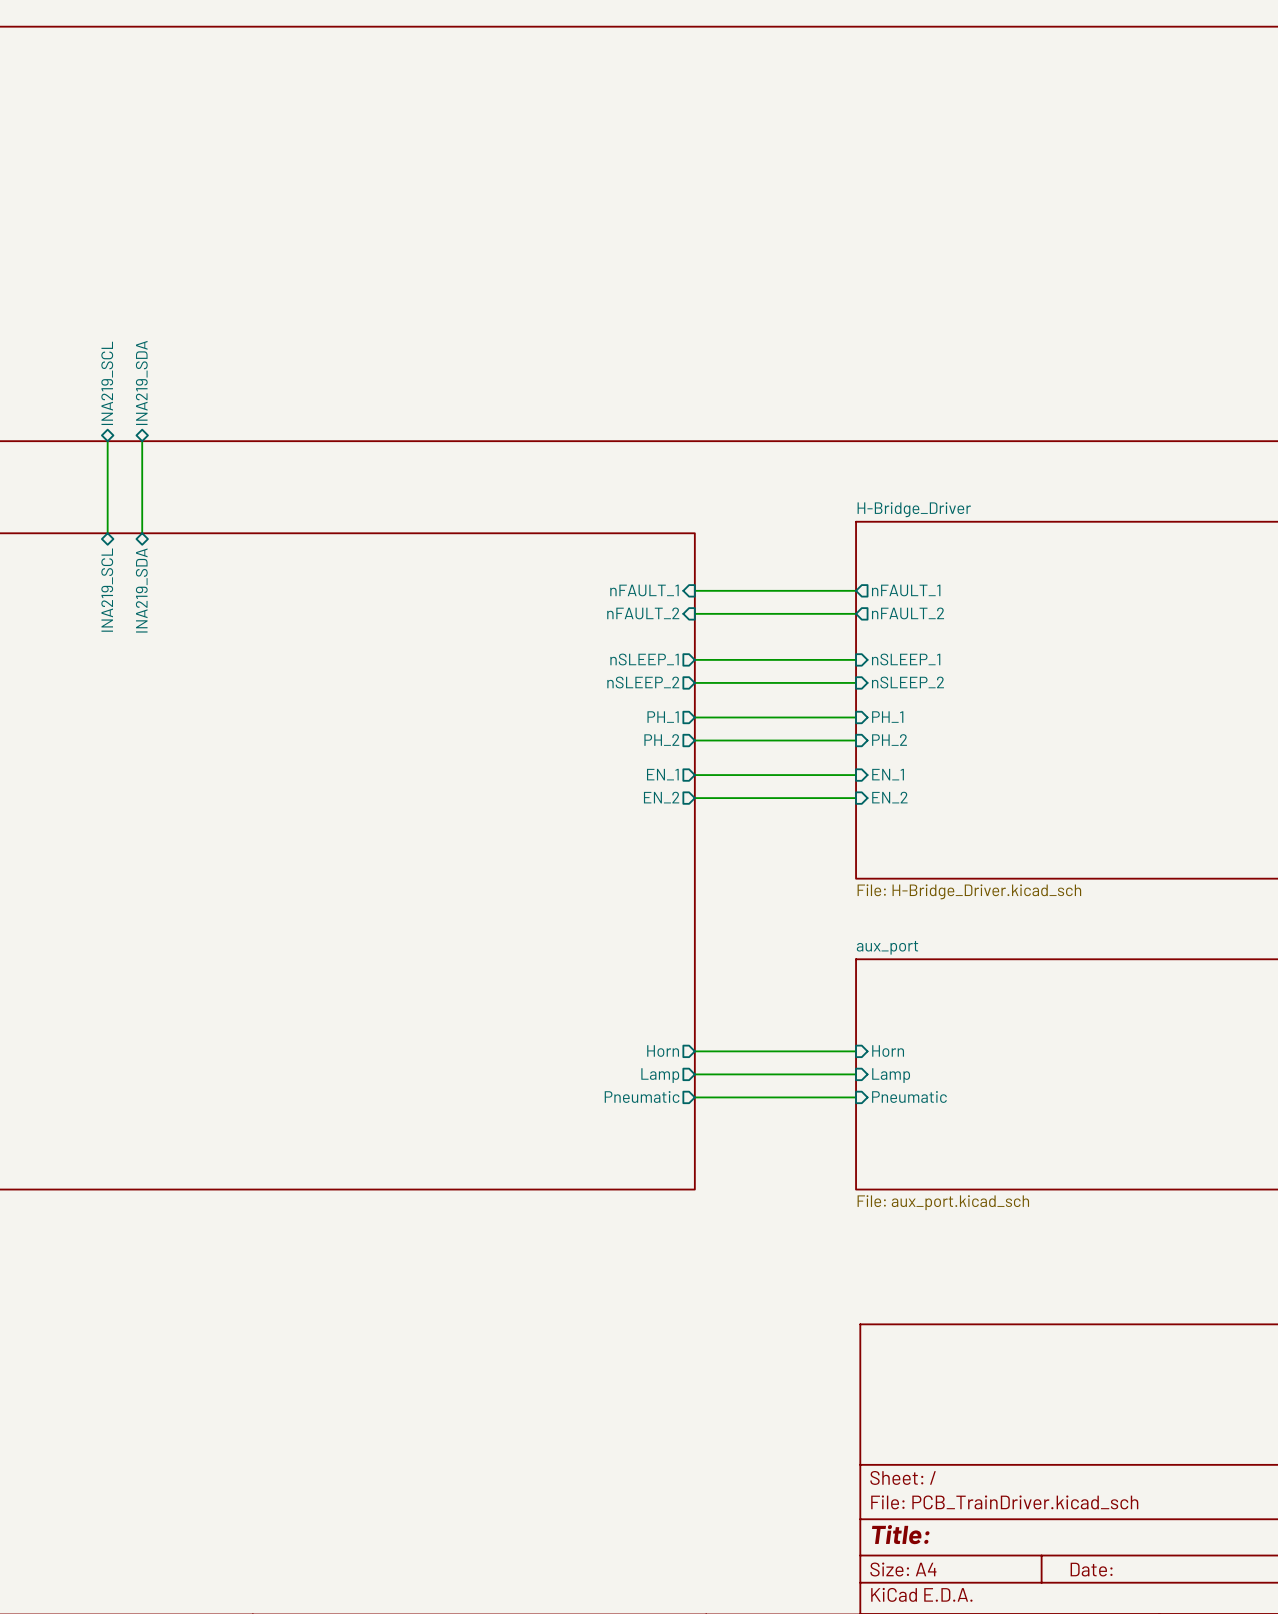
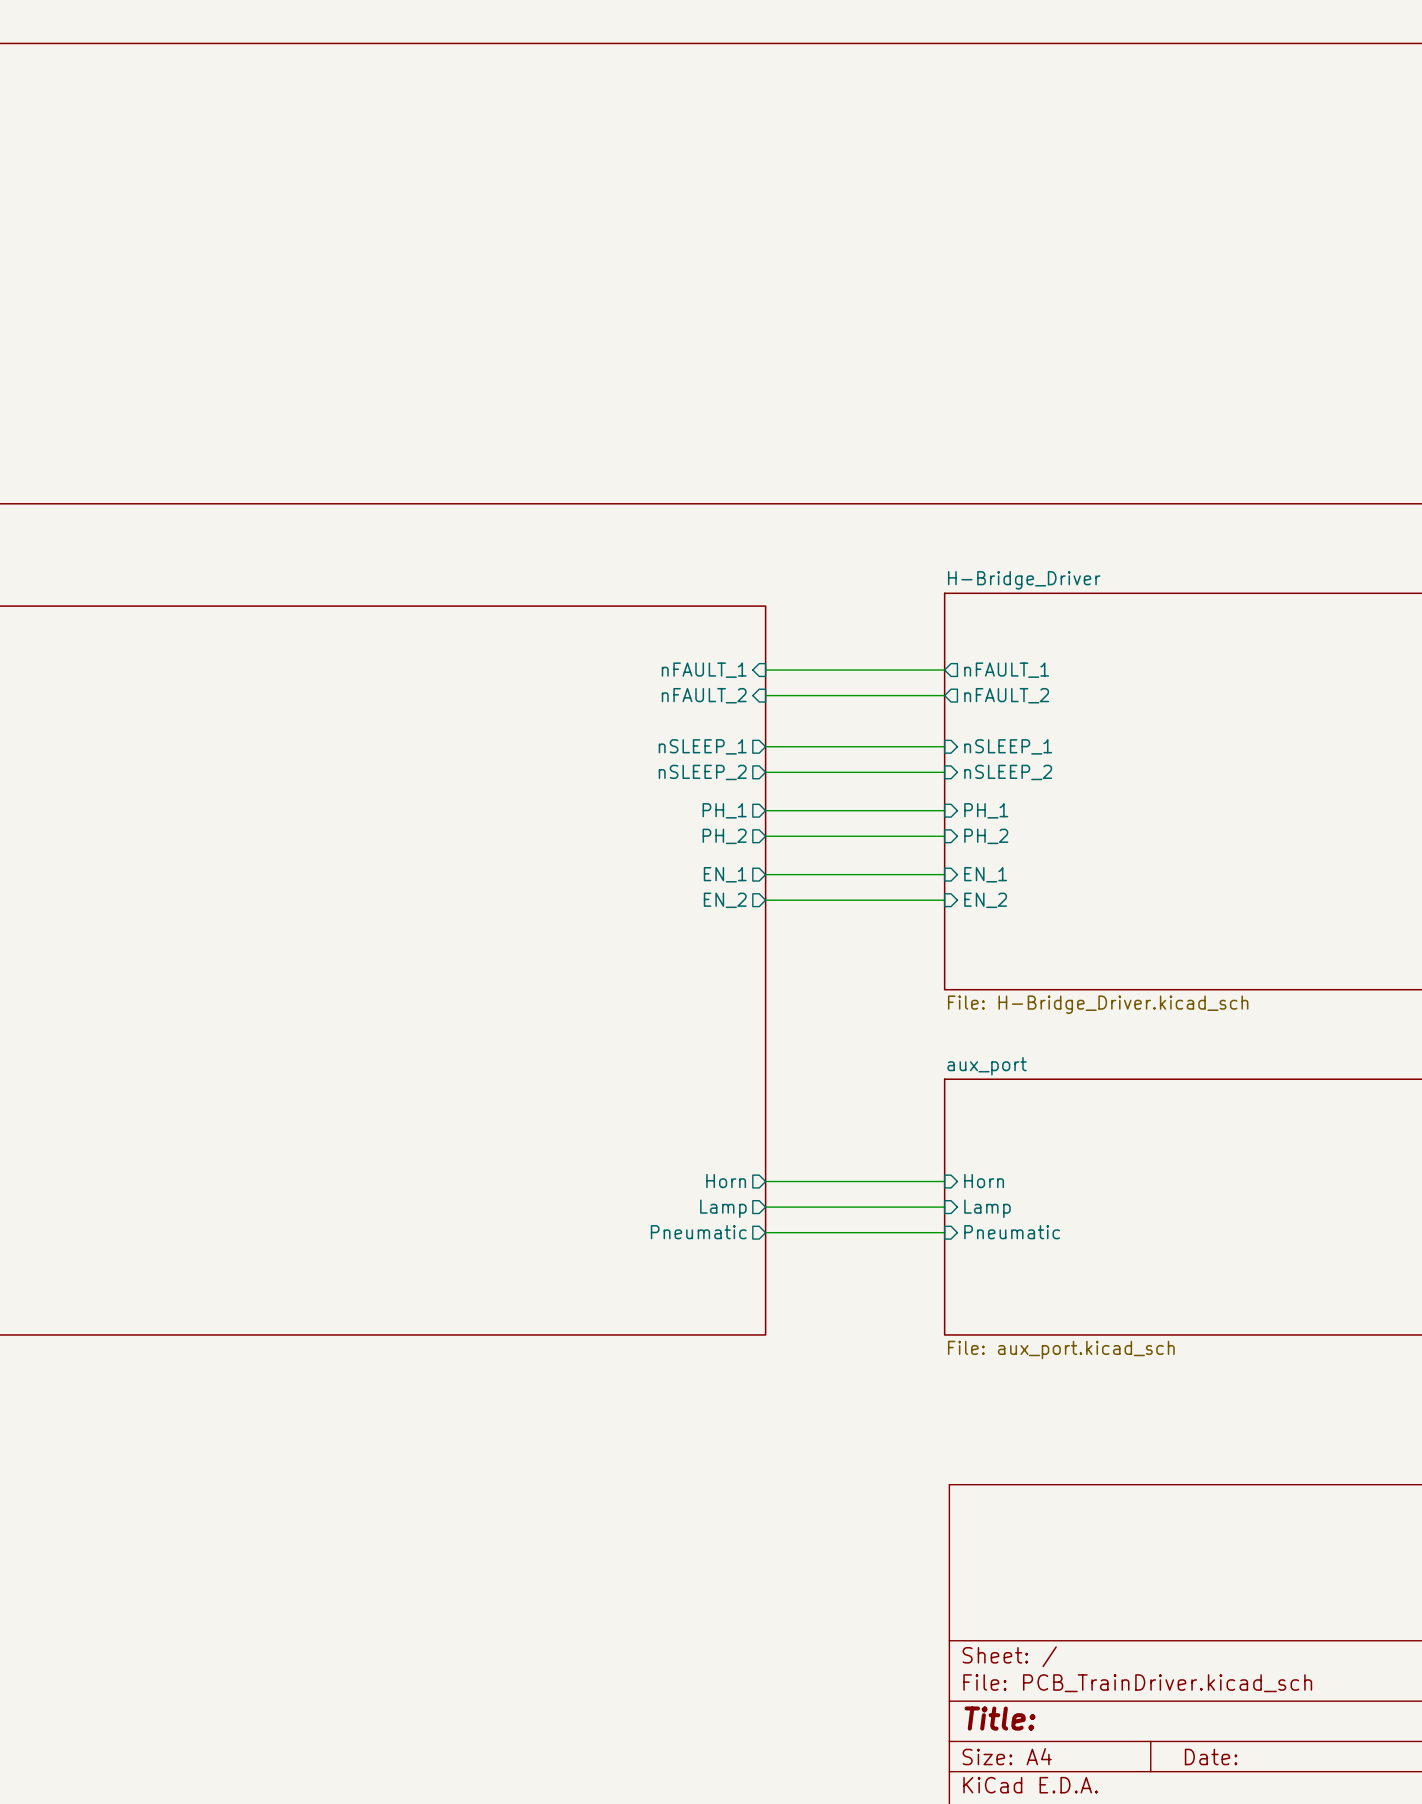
sheet pin: INA219_SDA (141, 382) -> none
sheet pin: INA219_SCL (107, 383) -> none
wire: (107, 441) (107, 533) -> none
wire: (142, 441) (142, 533) -> none
sheet pin: INA219_SCL (107, 590) -> none
sheet pin: INA219_SDA (141, 590) -> none

